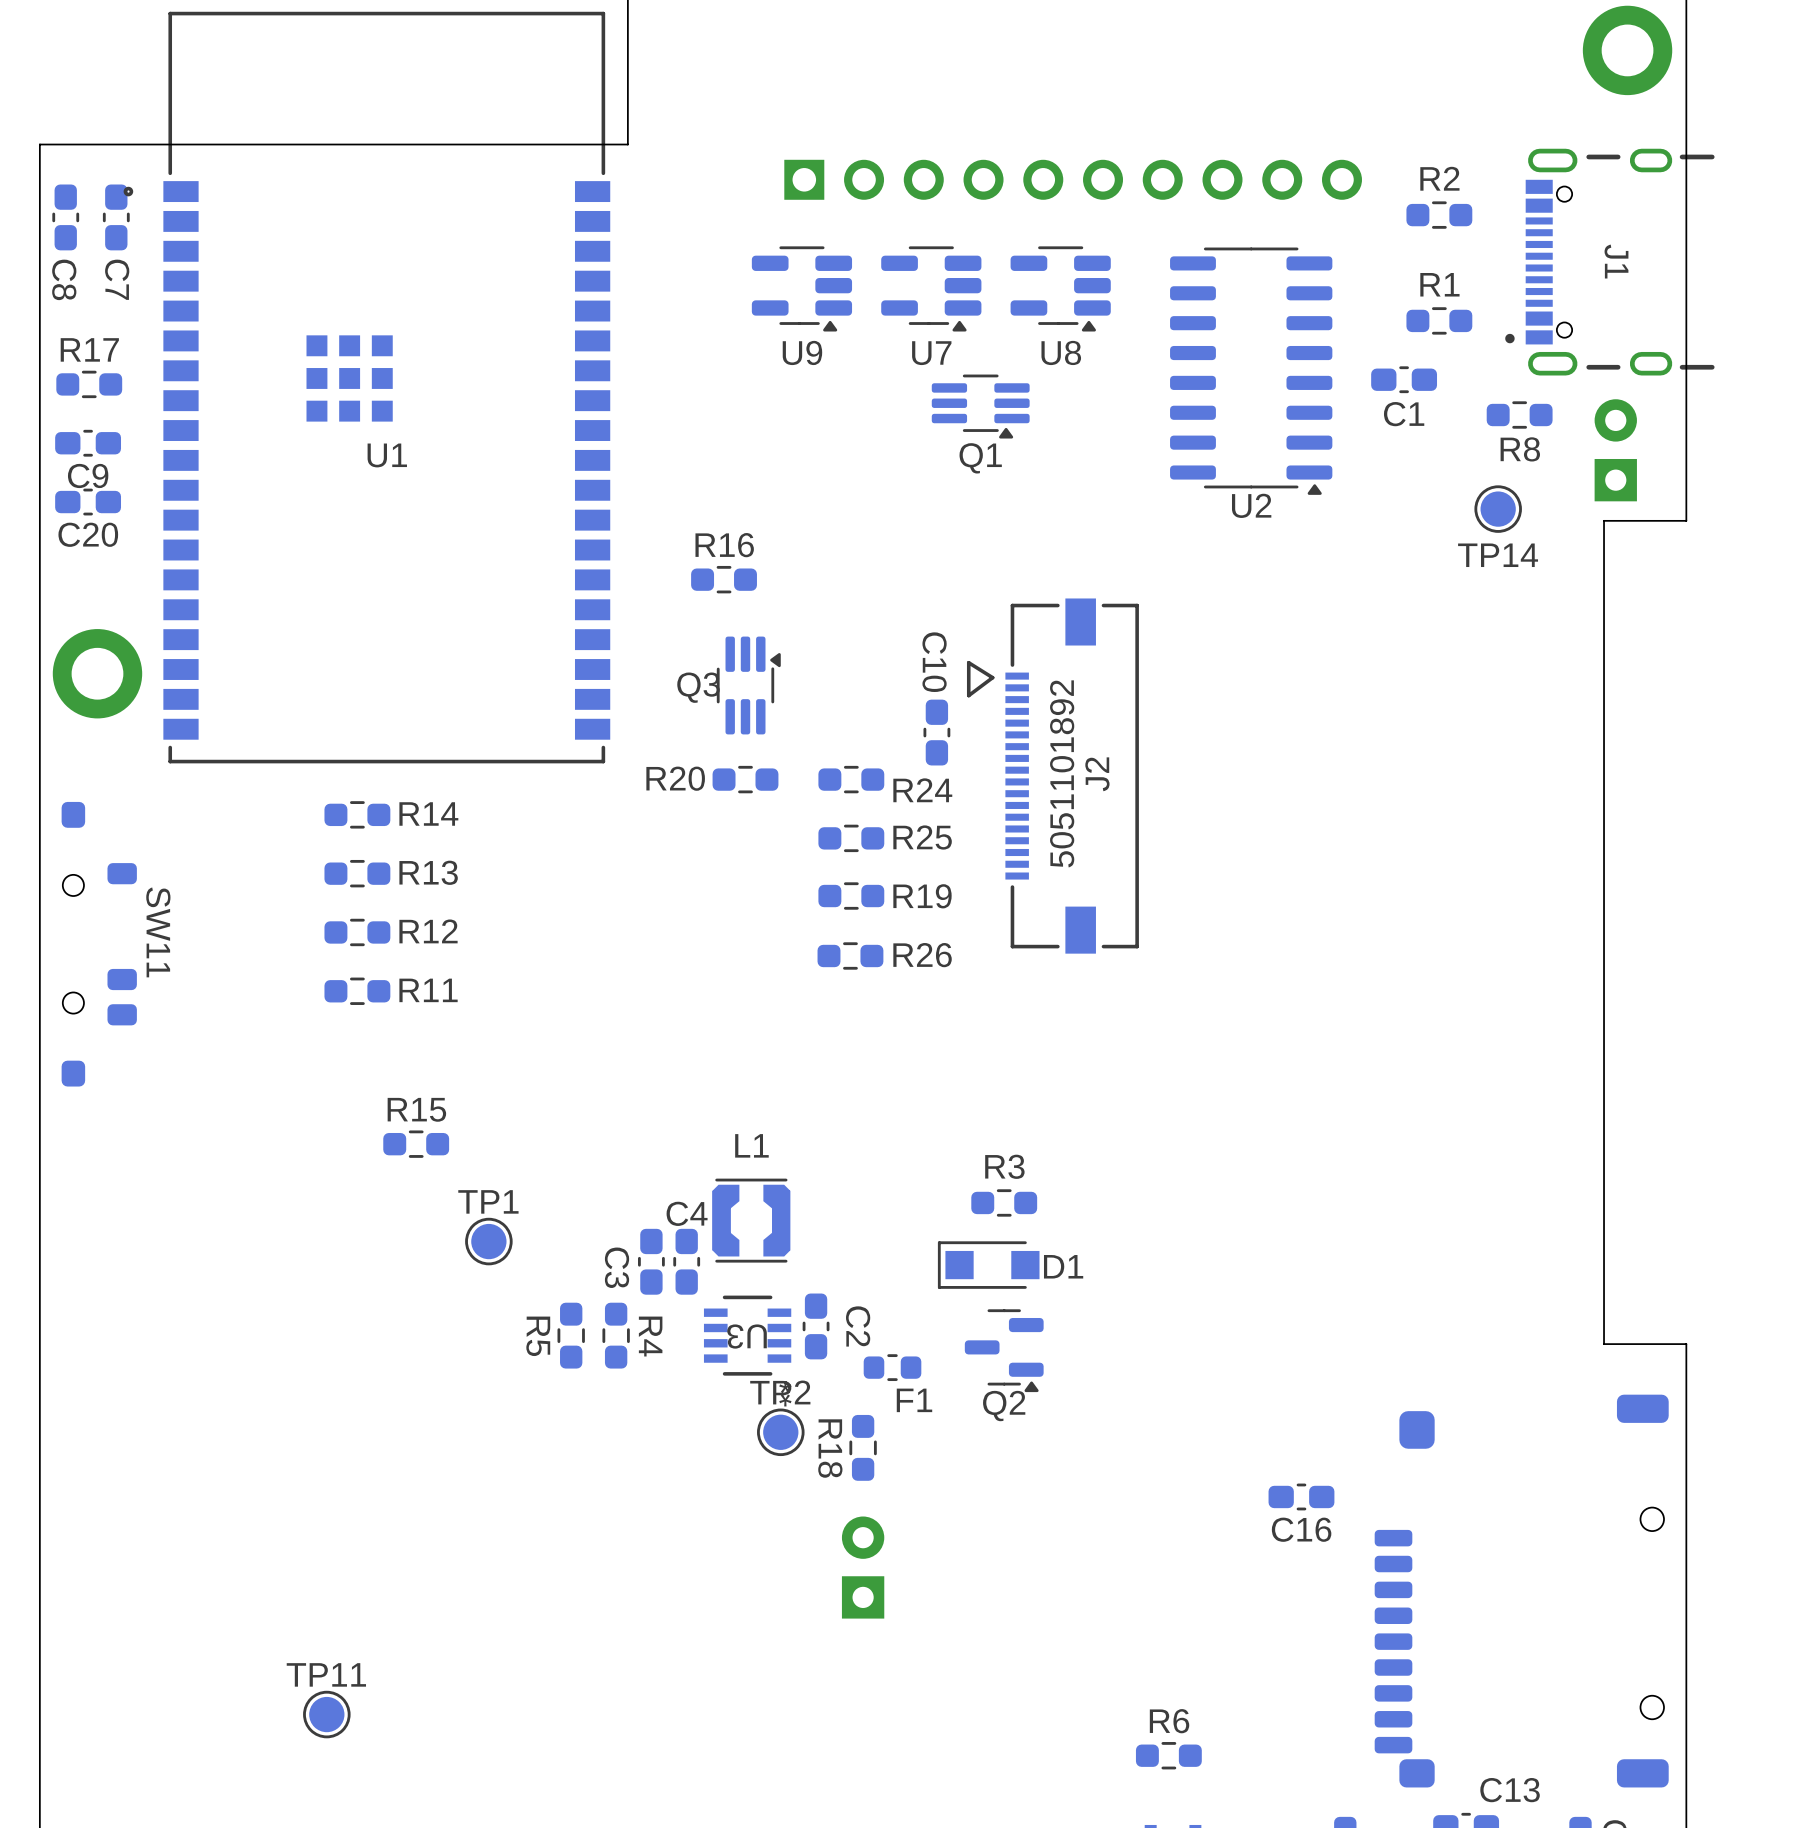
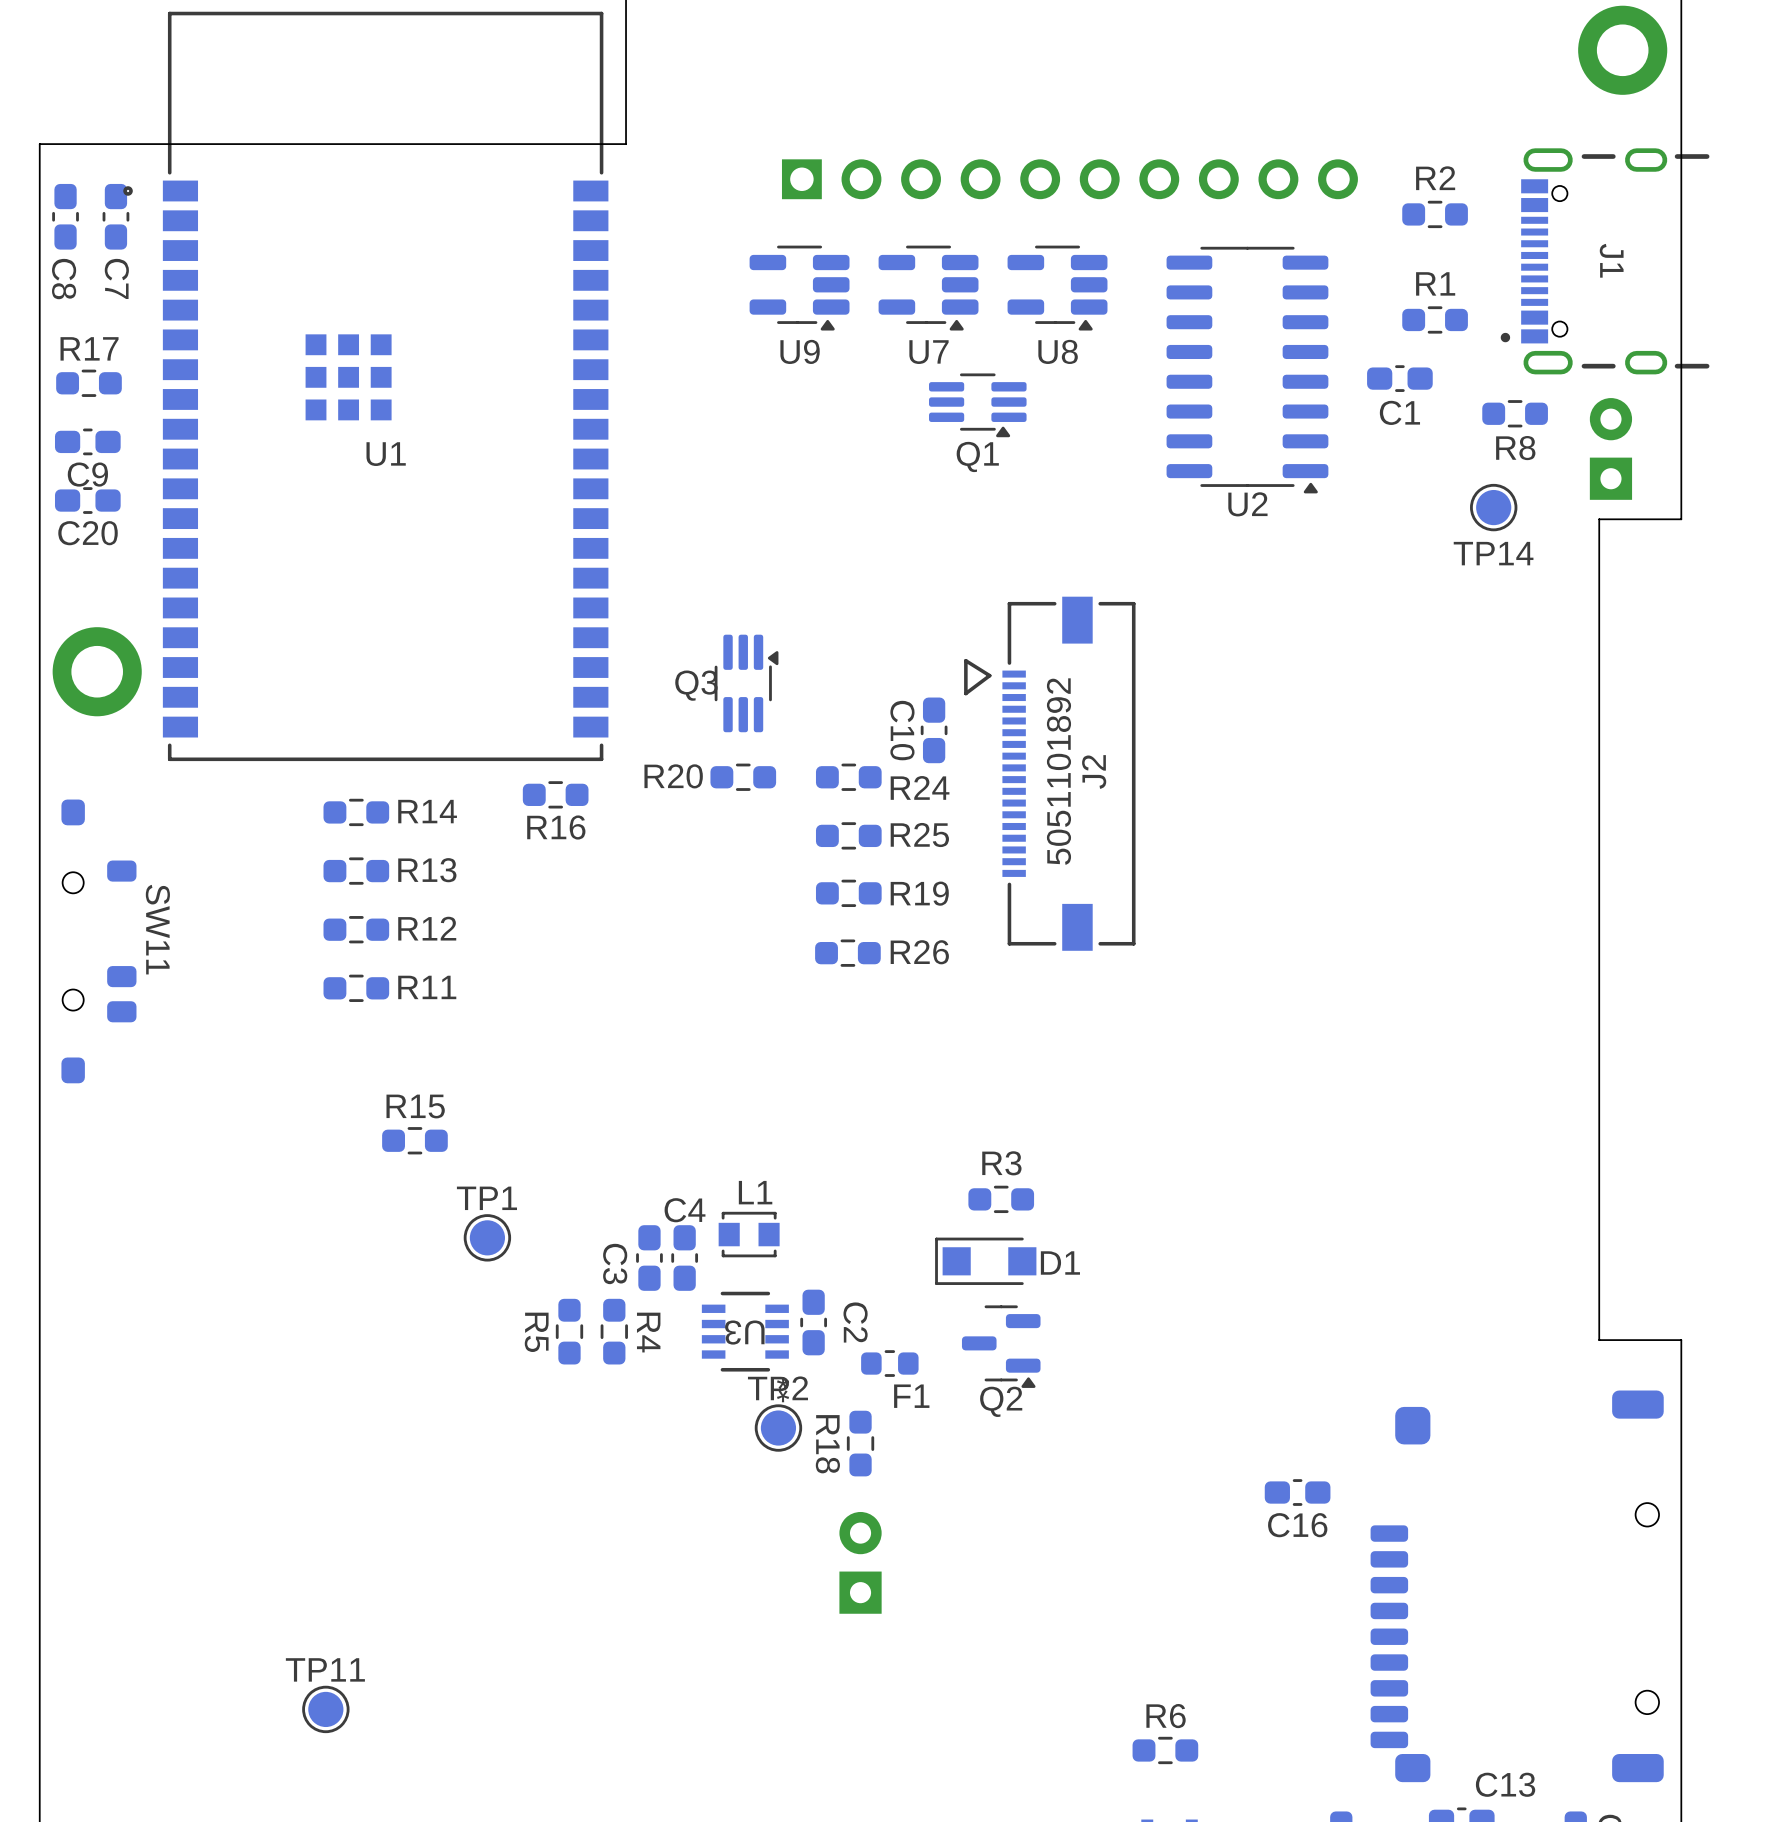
R16 name position: R16 (724, 545) -> R16 (556, 827)
R16 position: (724, 579) -> (555, 794)
C10 name position: C10 (934, 662) -> C10 (902, 730)
L1 footprint: [712, 1178, 791, 1263] -> [718, 1211, 780, 1258]

